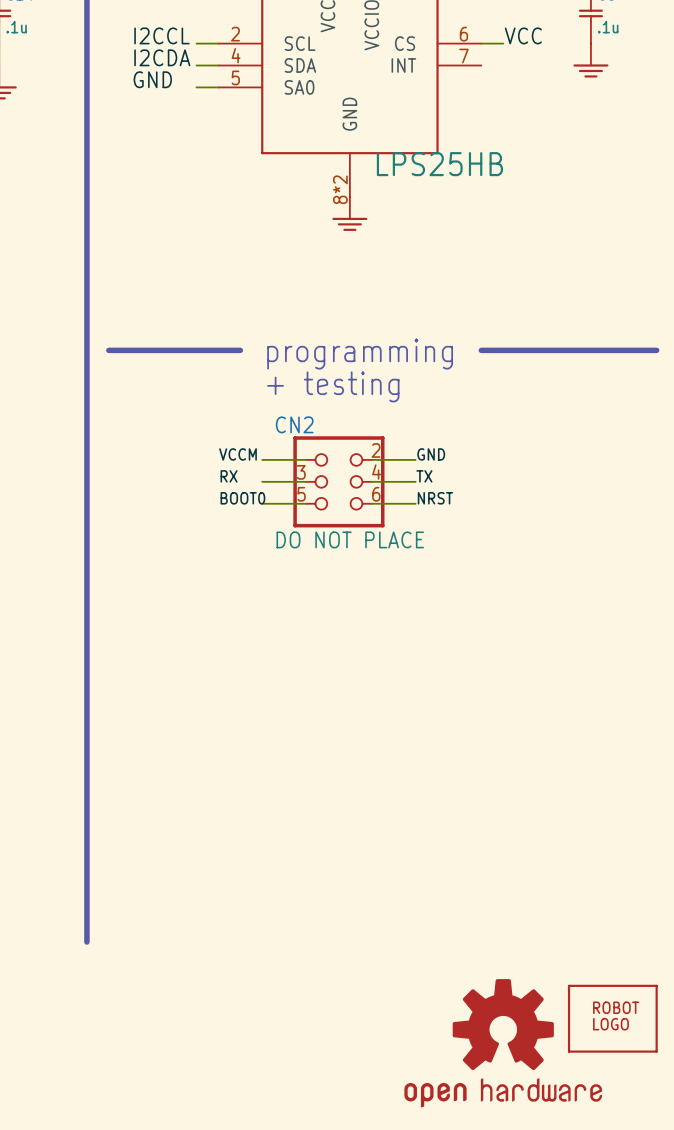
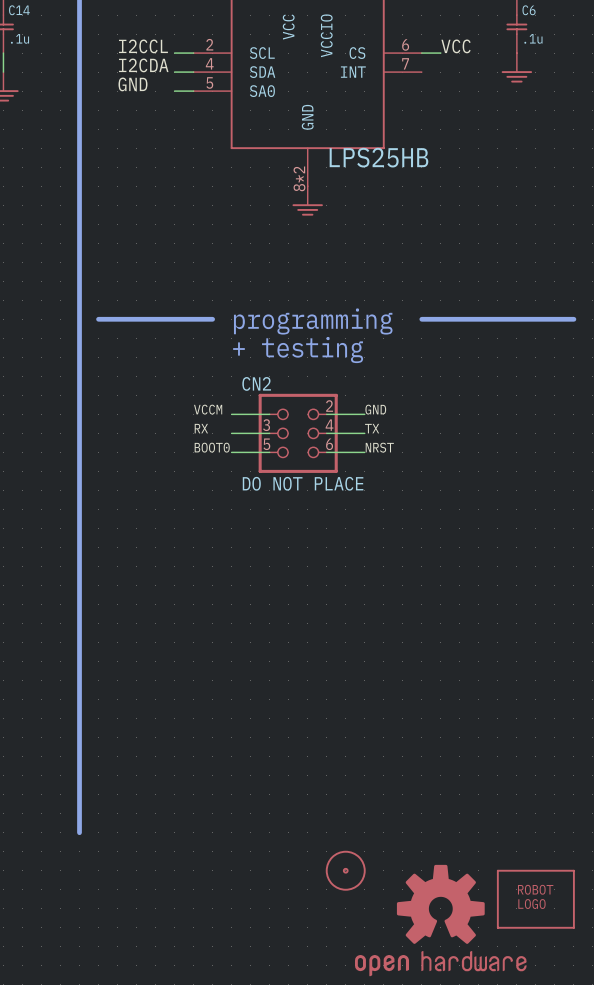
part: none -> (345, 870)

